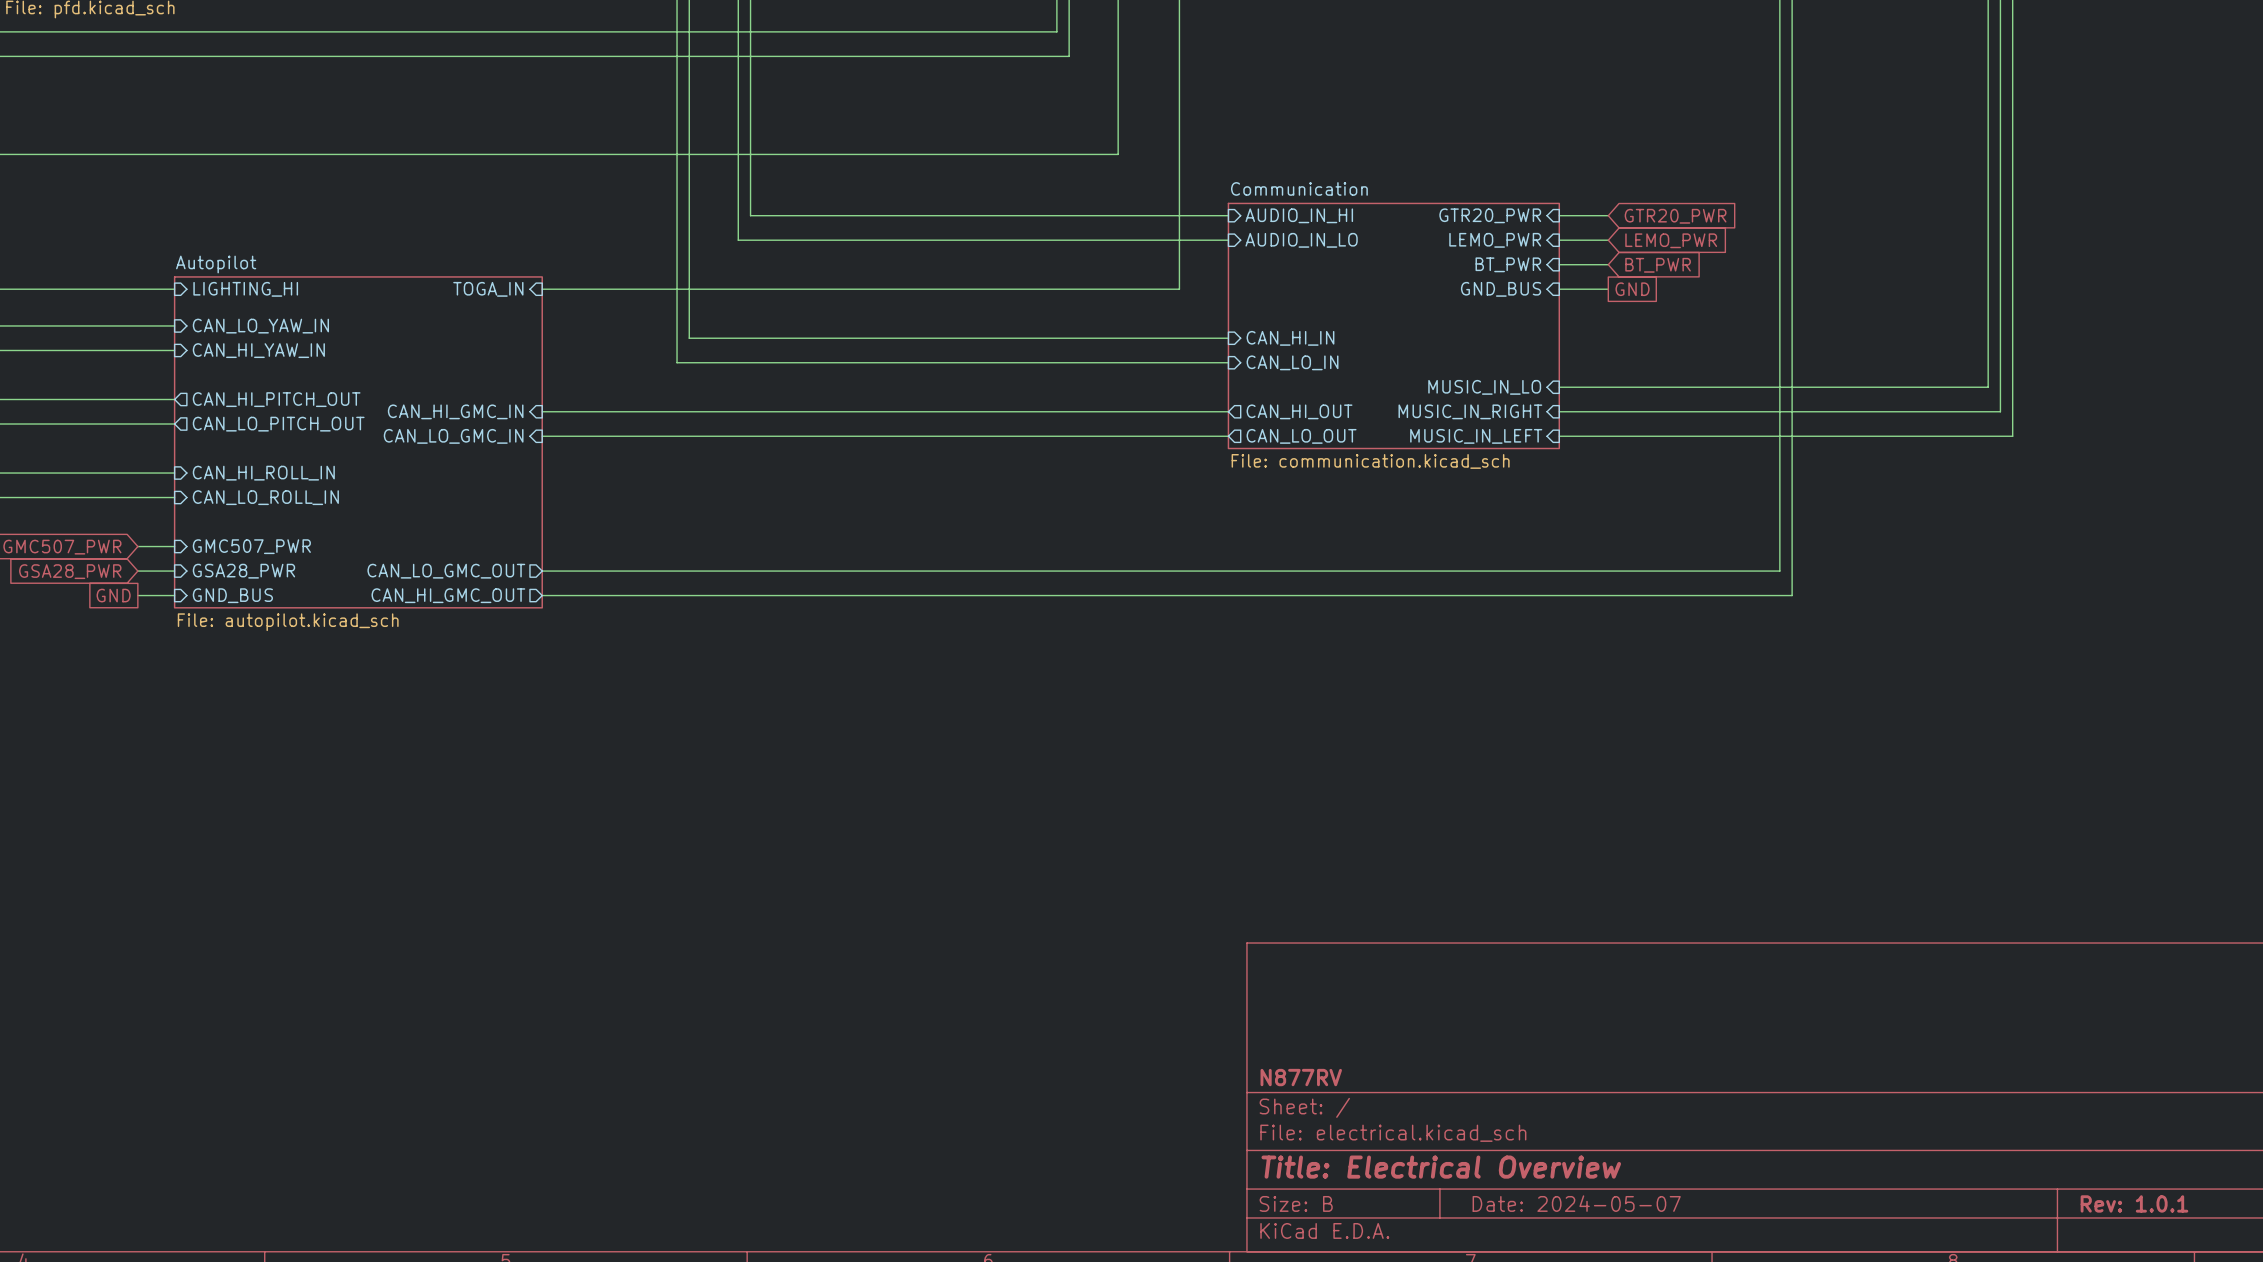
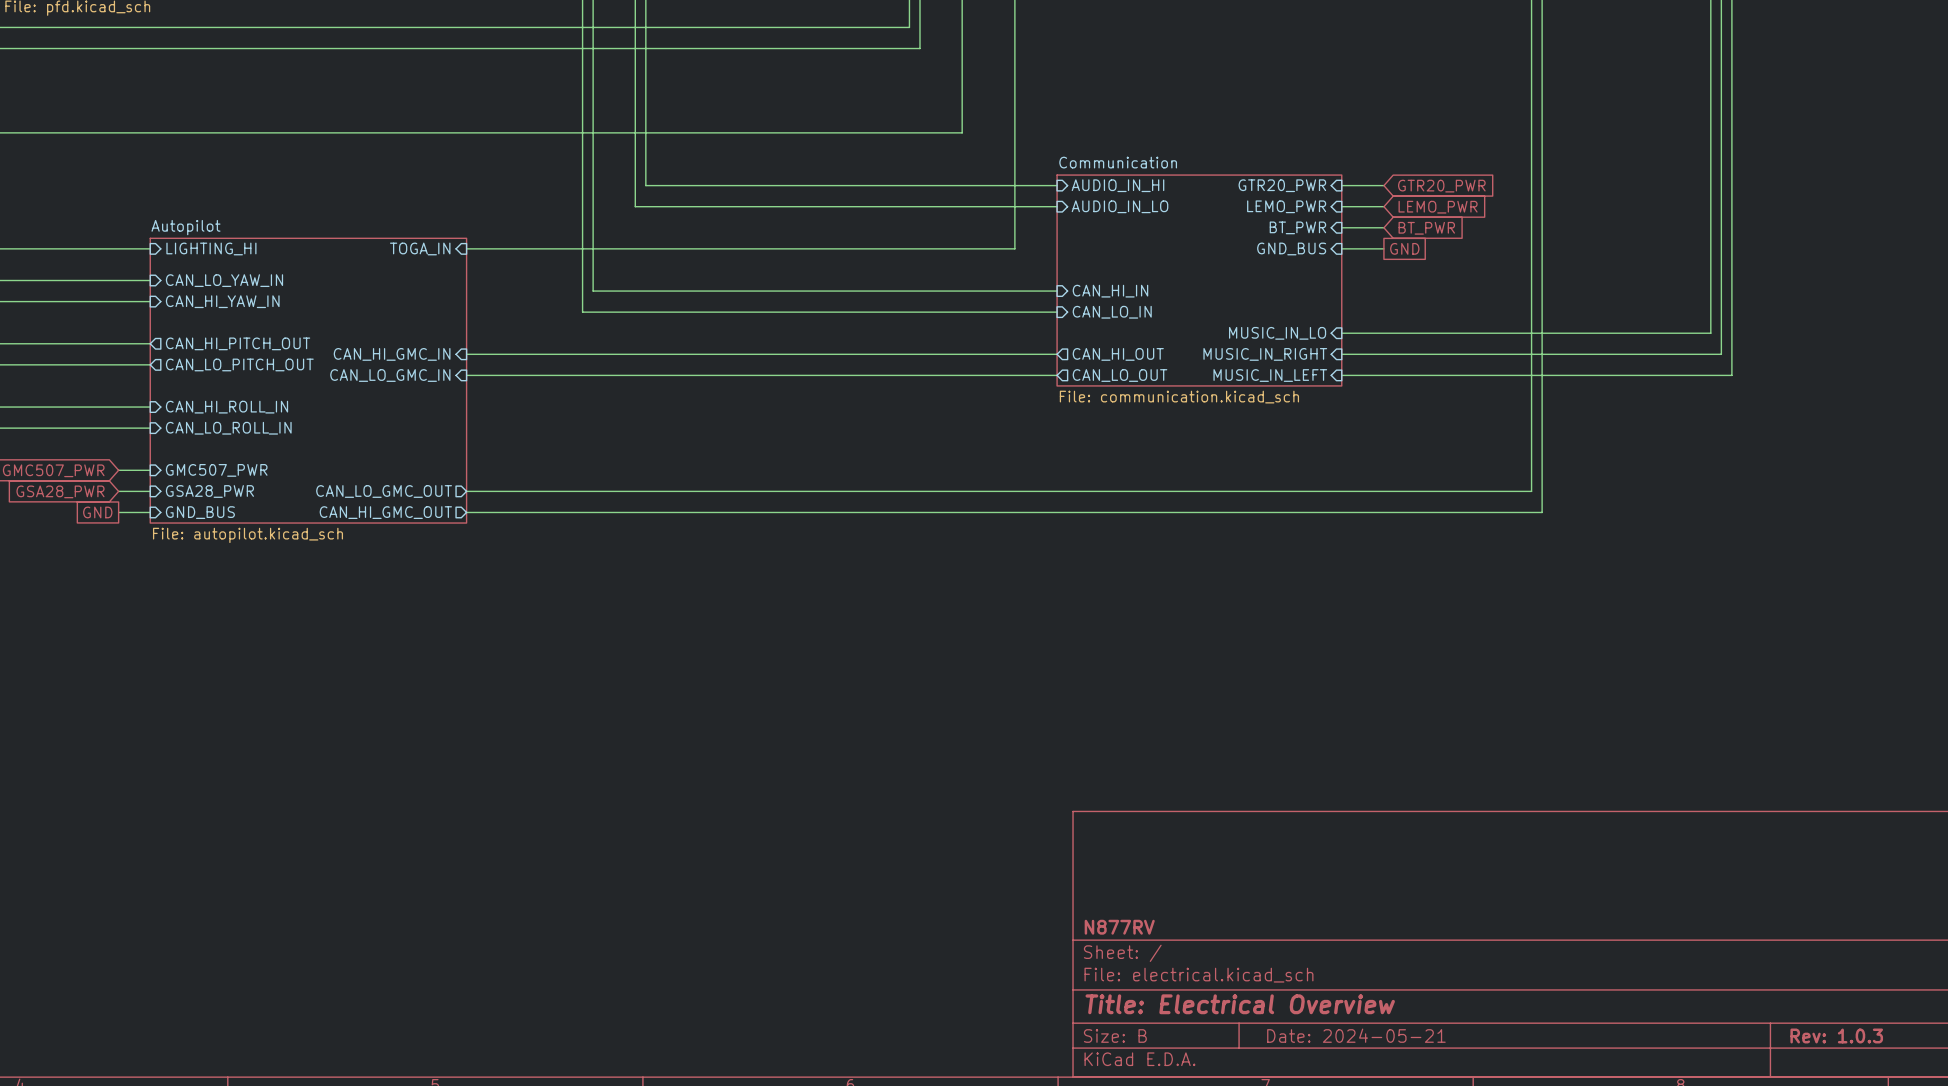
title block: Date: 2024-05-07 (1576, 1203) -> Date: 2024-05-21 (1356, 1035)
title block: Rev: 1.0.1 (2134, 1203) -> Rev: 1.0.3 (1836, 1035)

